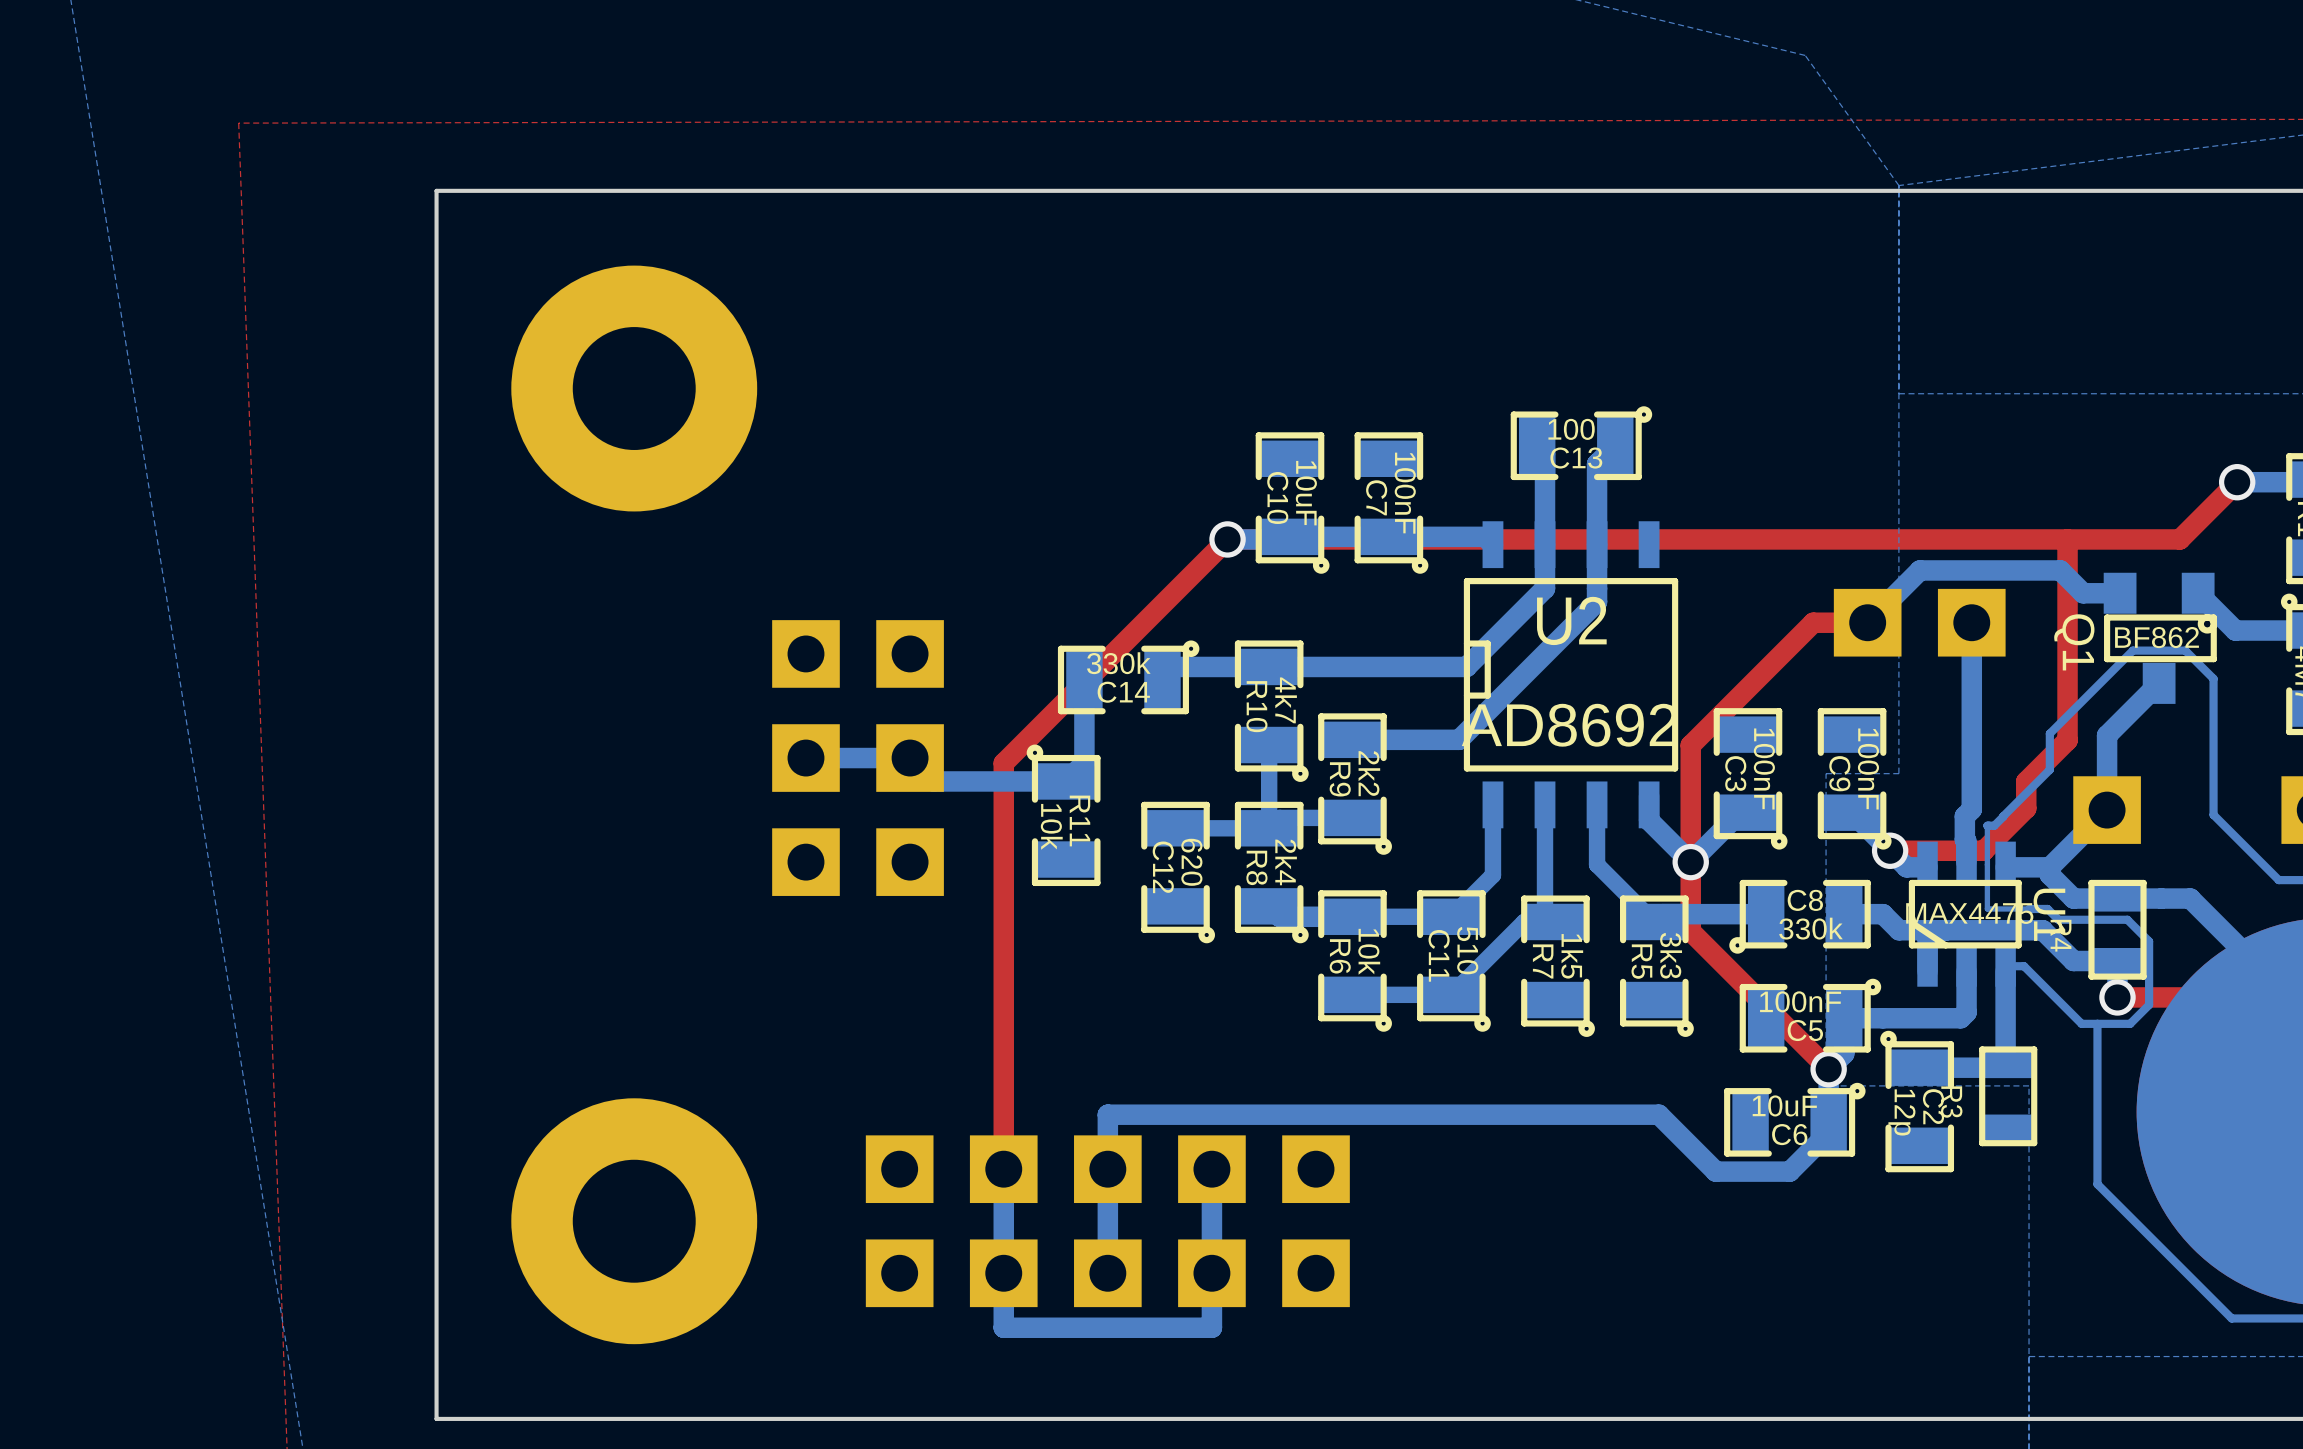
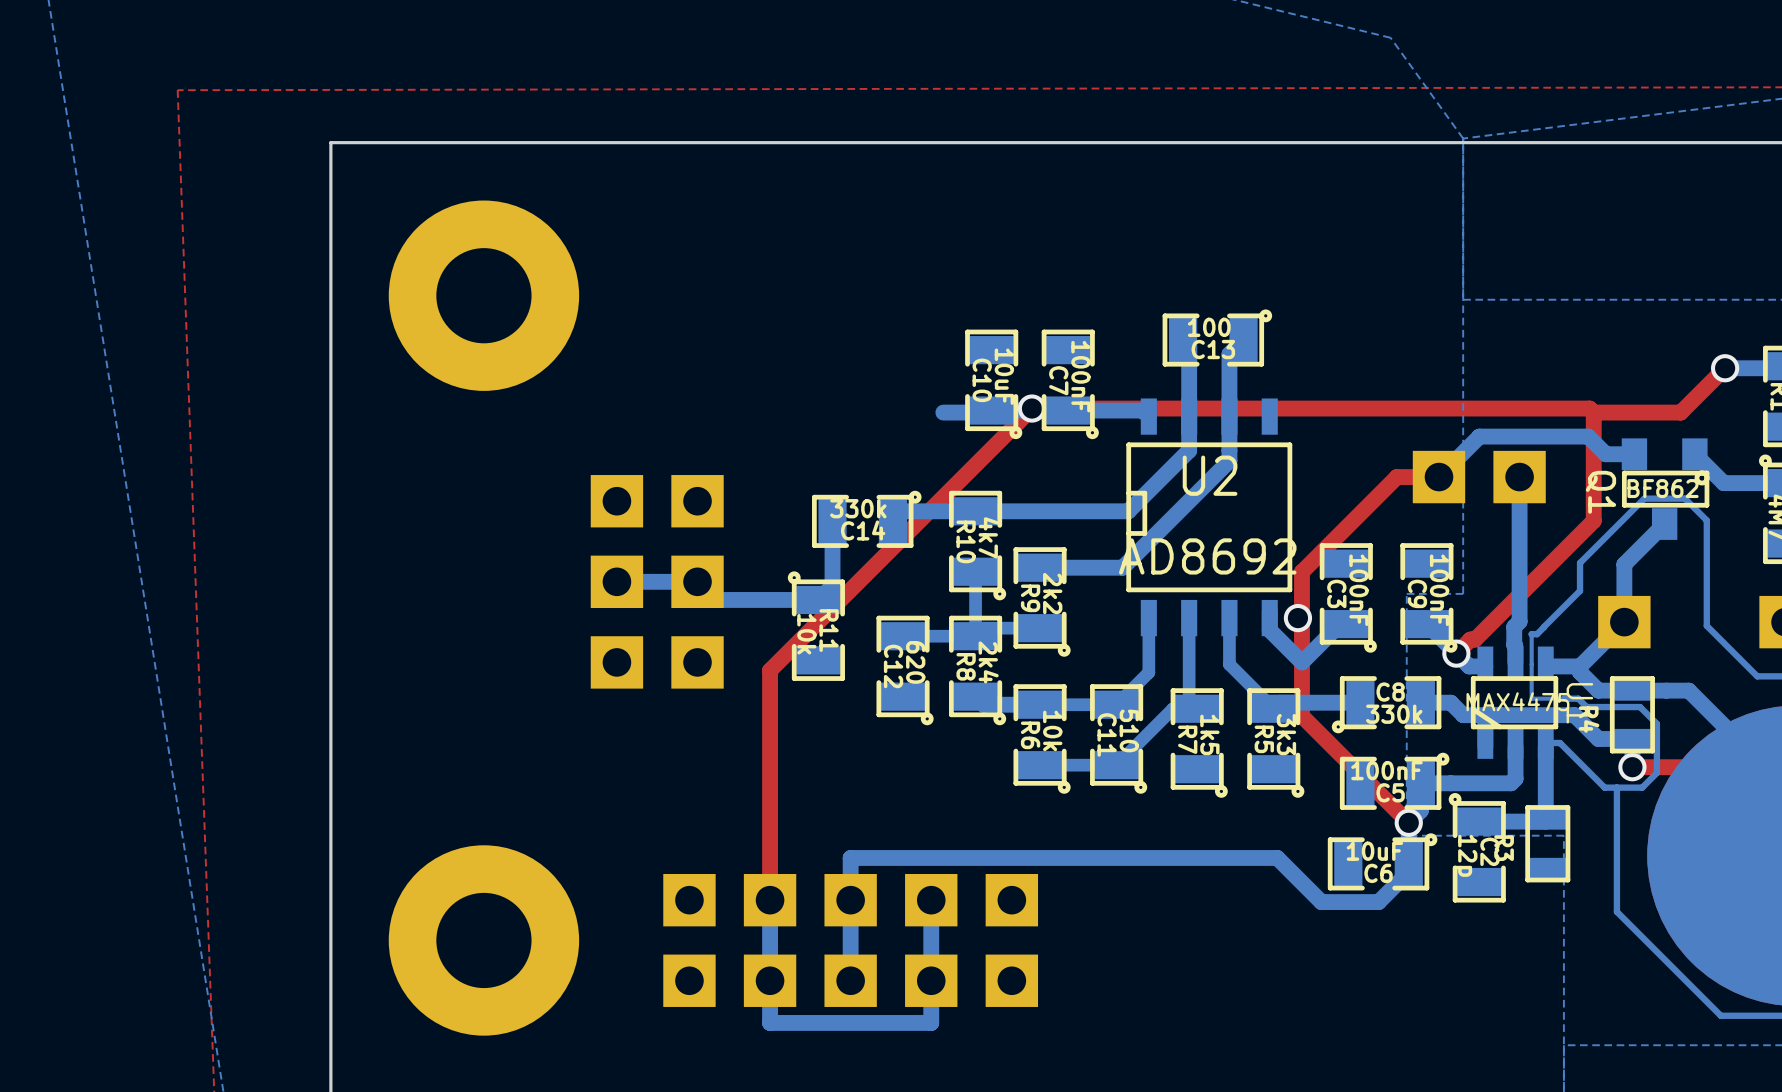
via position: (1227, 539) -> (1031, 408)
top track: (2067, 539) (1227, 539) (1003, 763) (1003, 872) -> (1593, 412) (1589, 408) (1031, 408) (770, 670)
top track: (2067, 679) (2067, 740) (2026, 781) (2026, 808) (1983, 850) (1890, 850) -> (1593, 520) (1475, 639) (1470, 639) (1456, 653)
via position: (1690, 862) -> (1297, 618)

